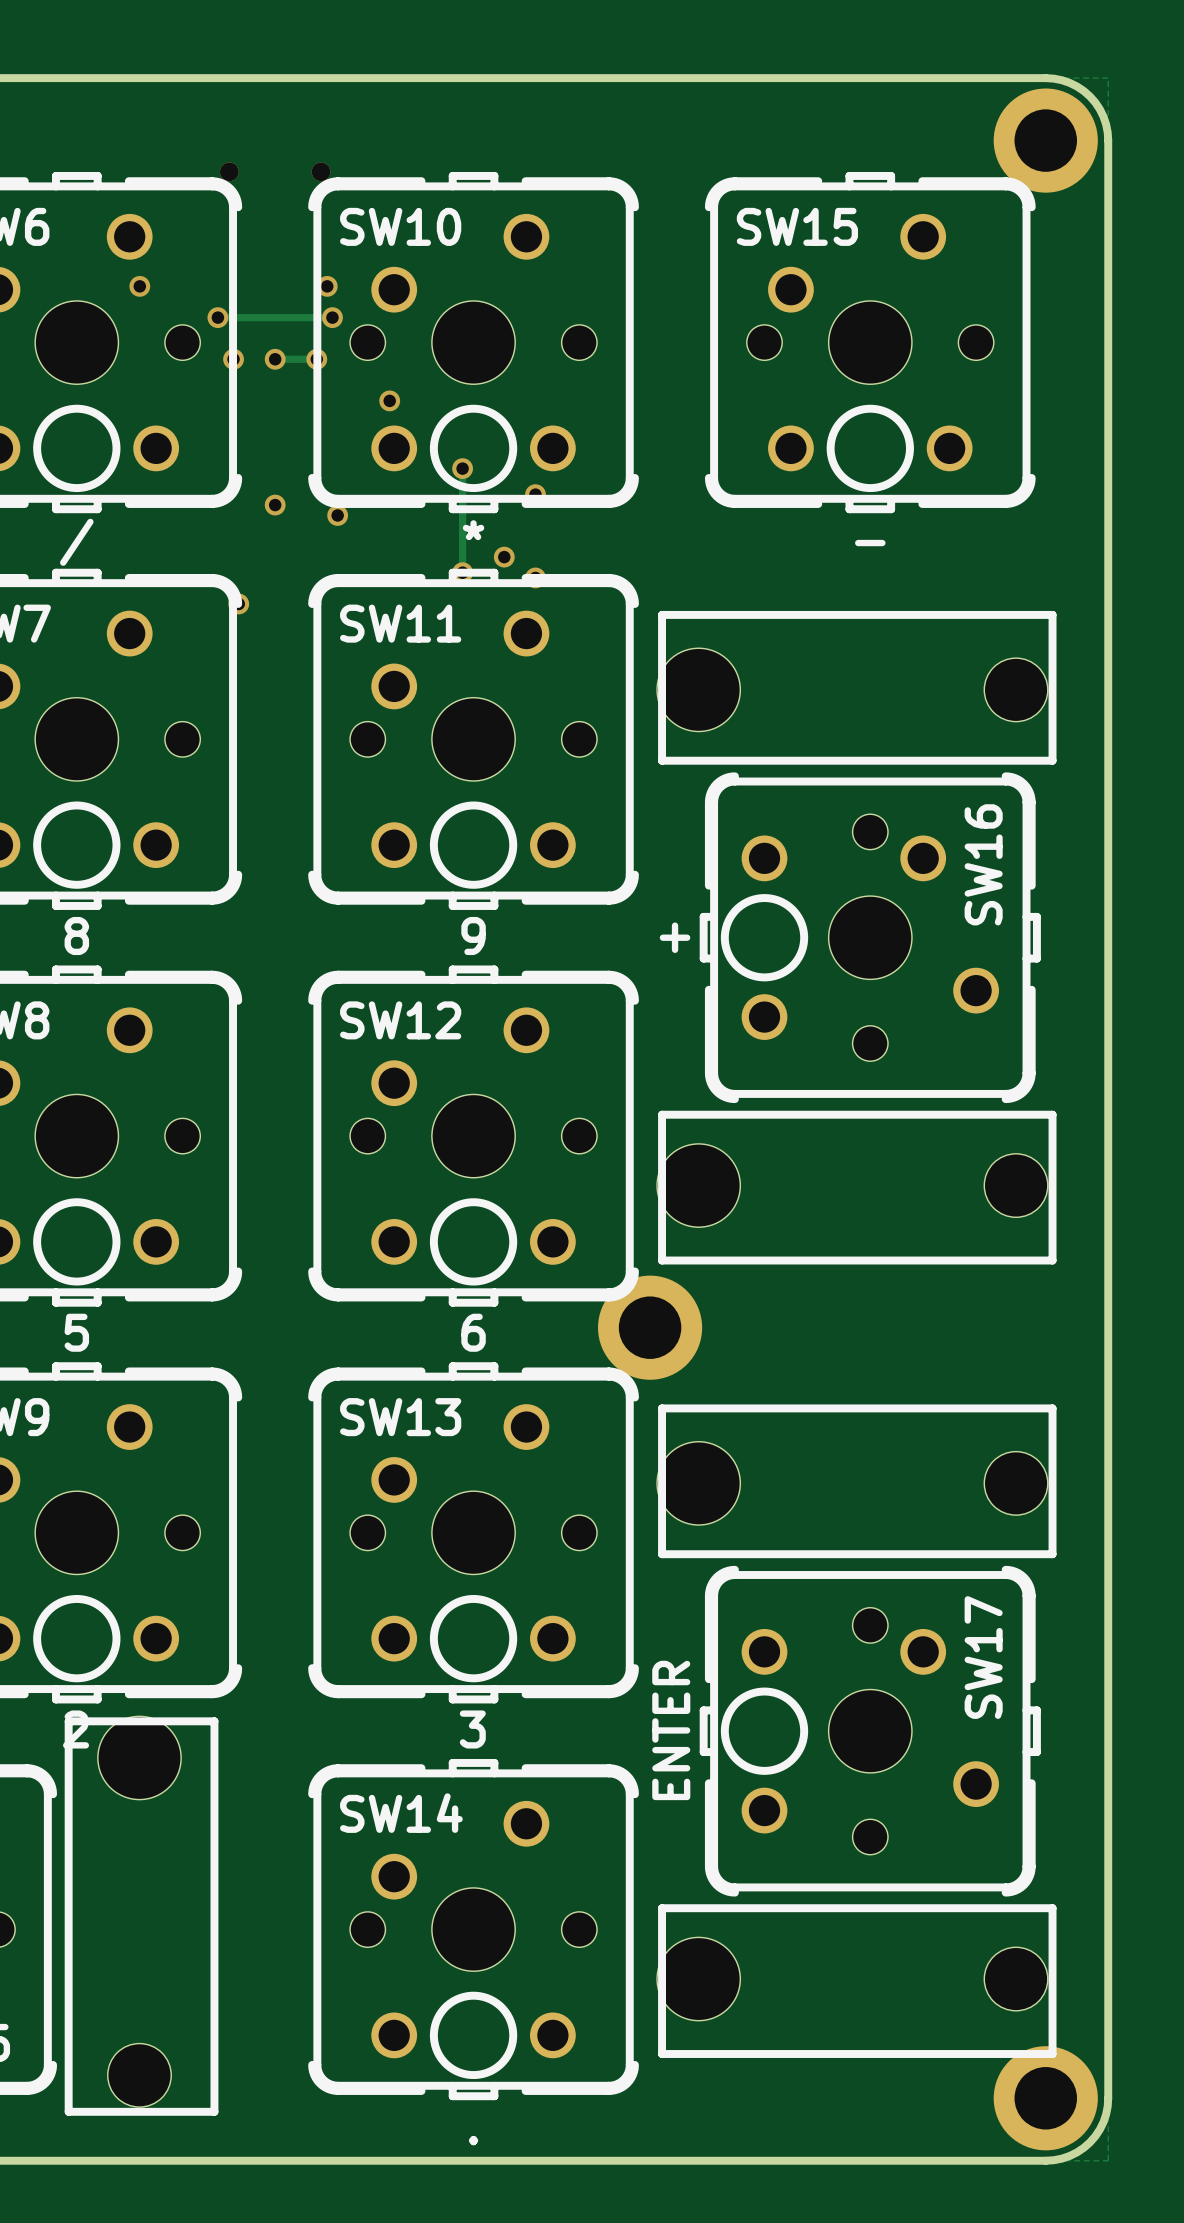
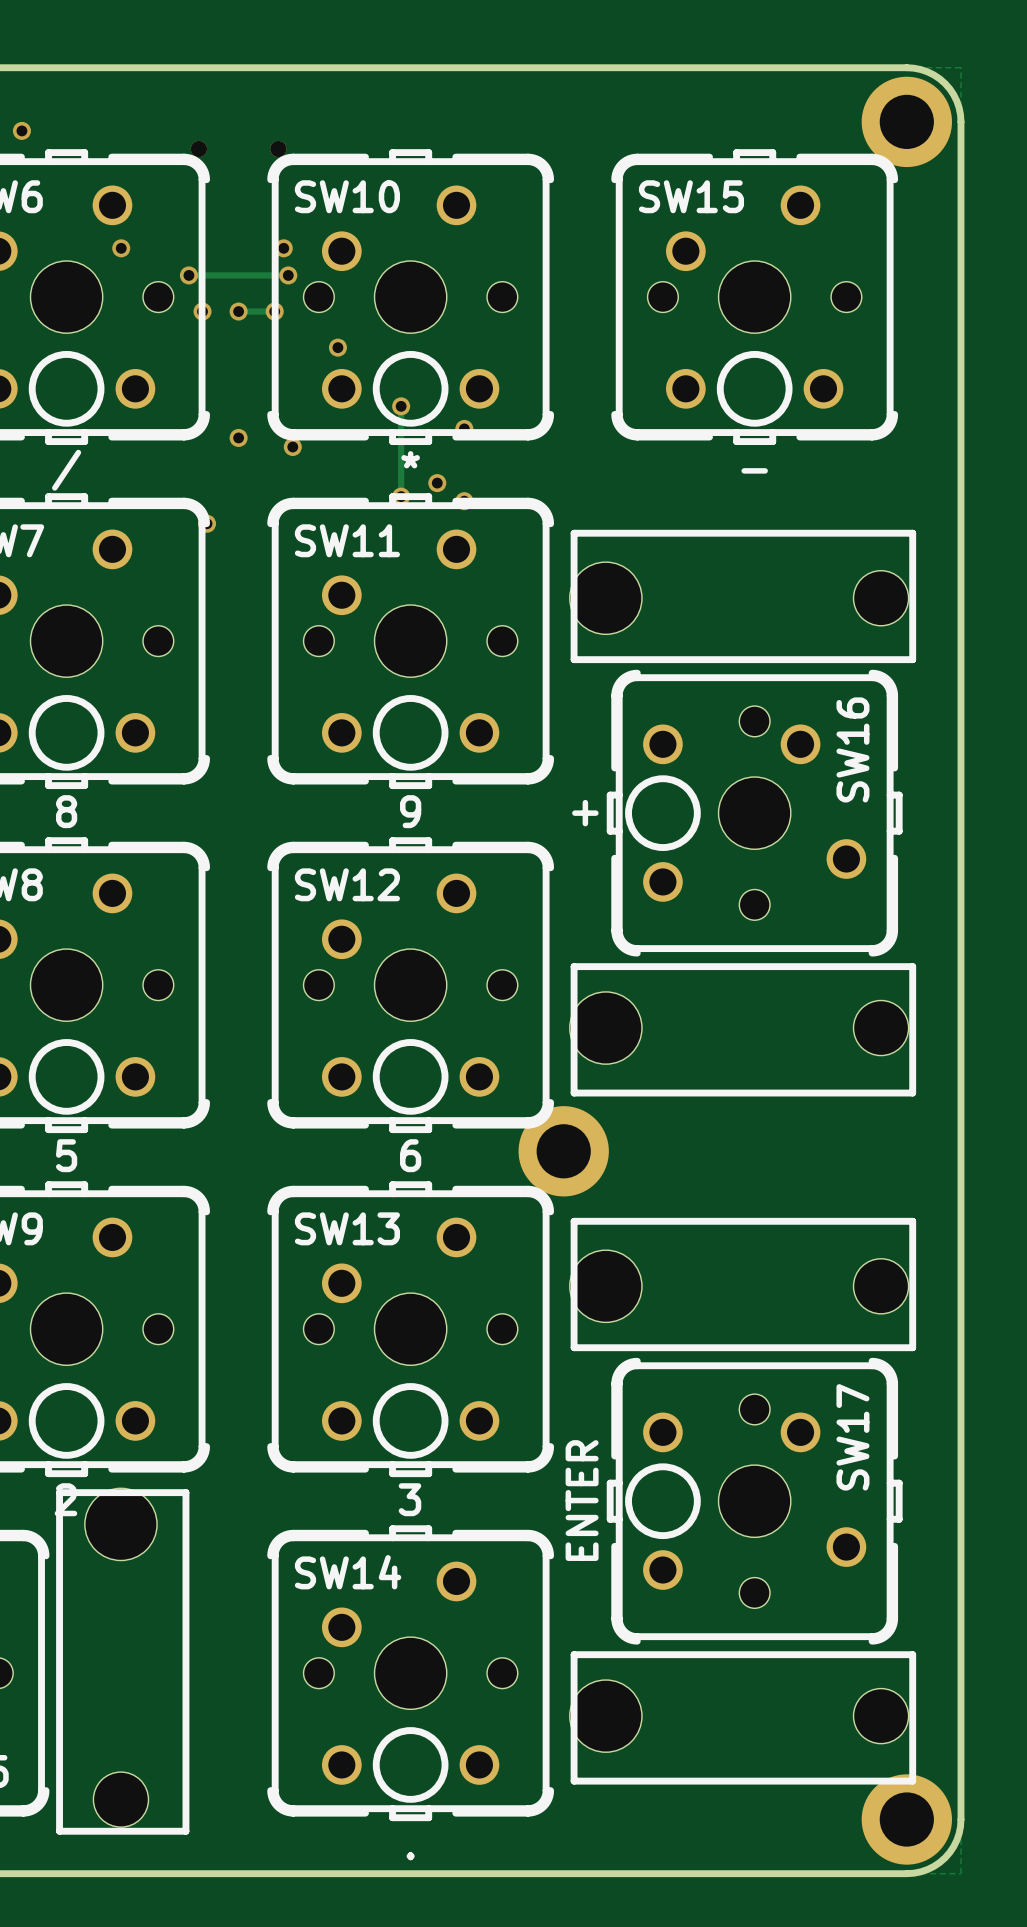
via: none -> (21, 130)

